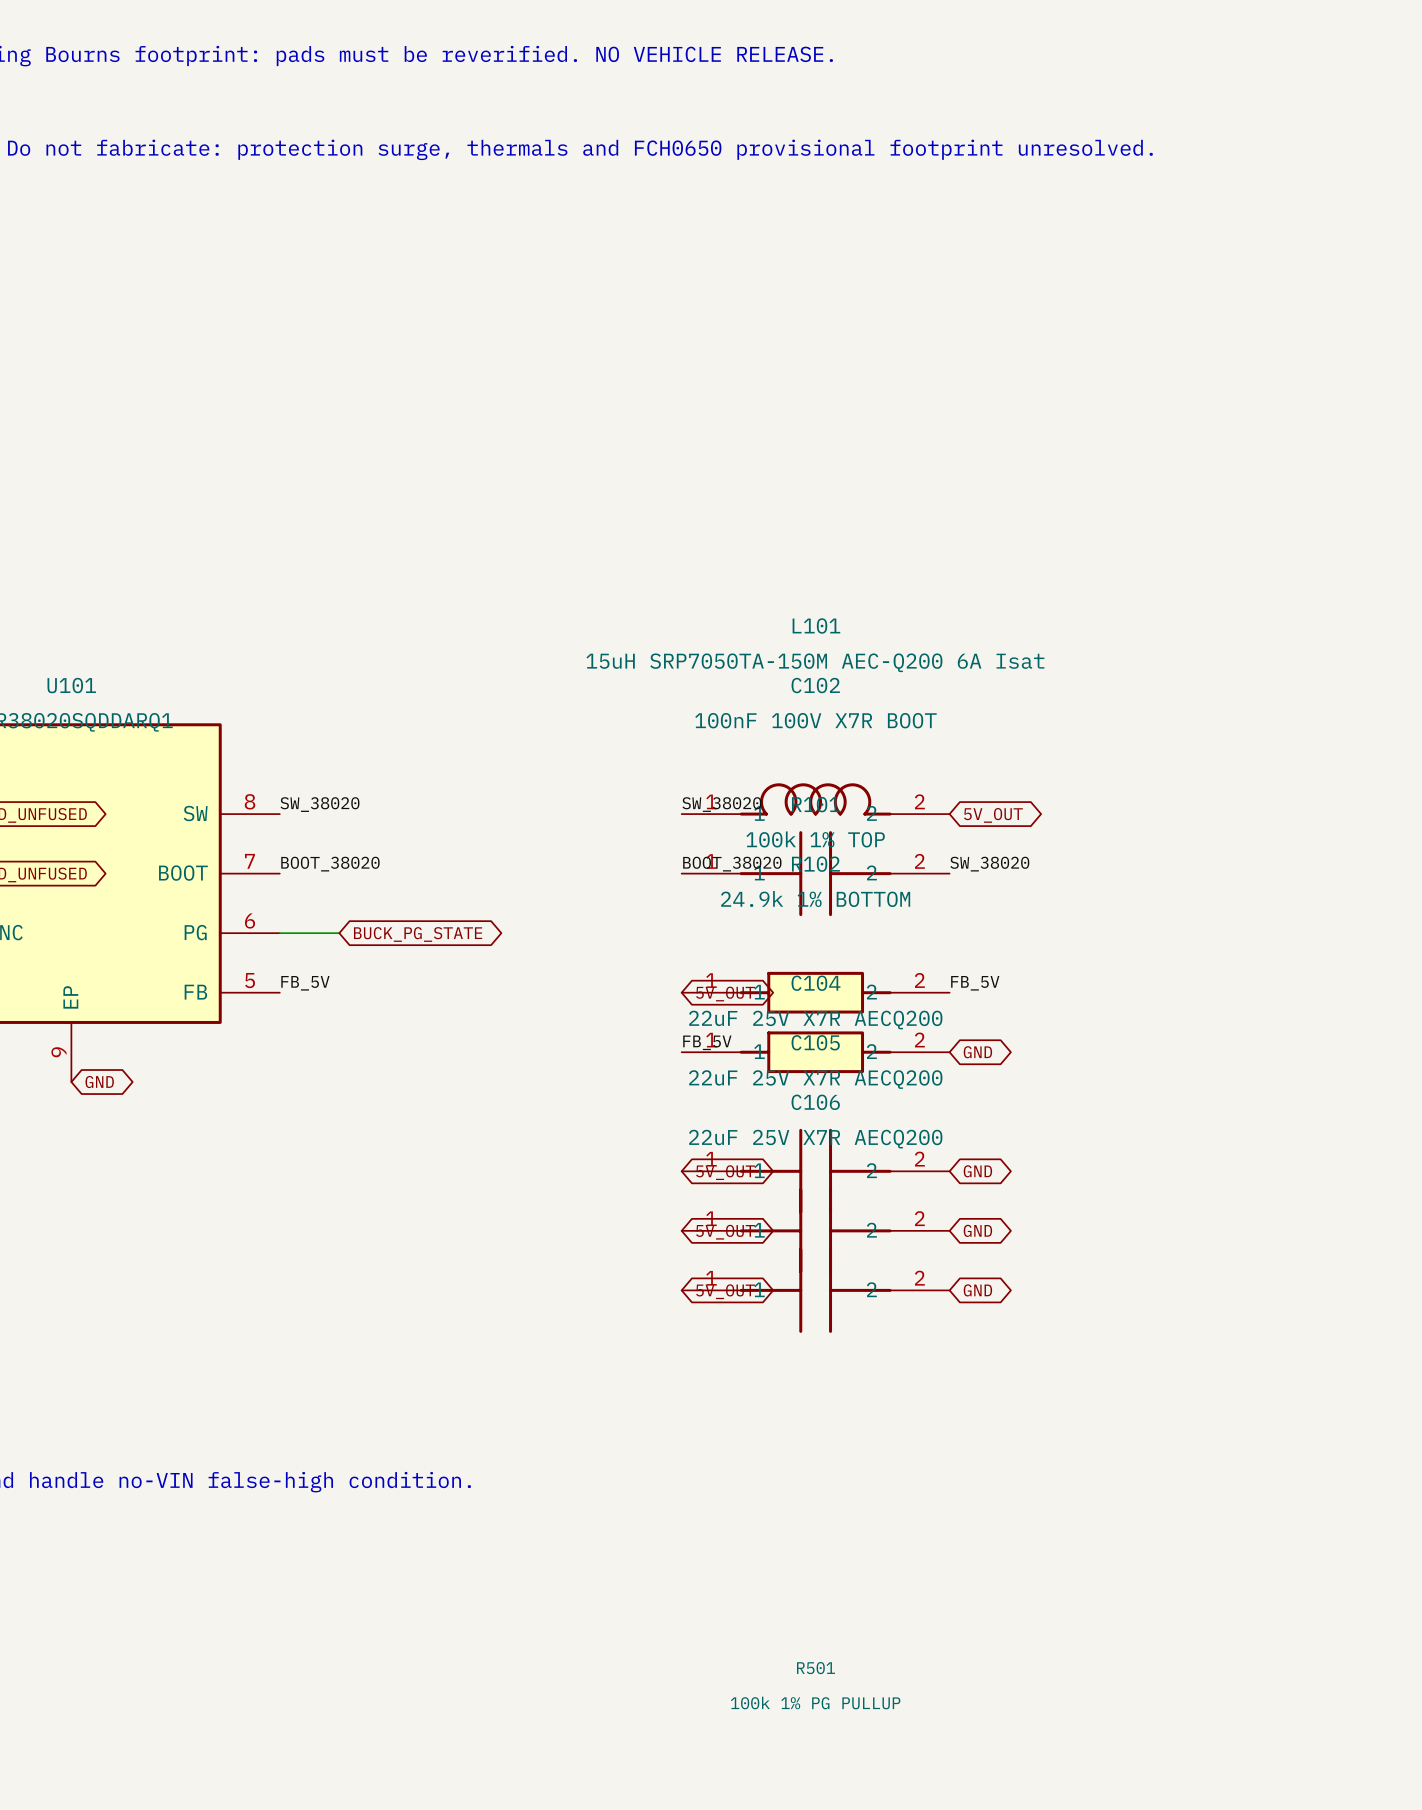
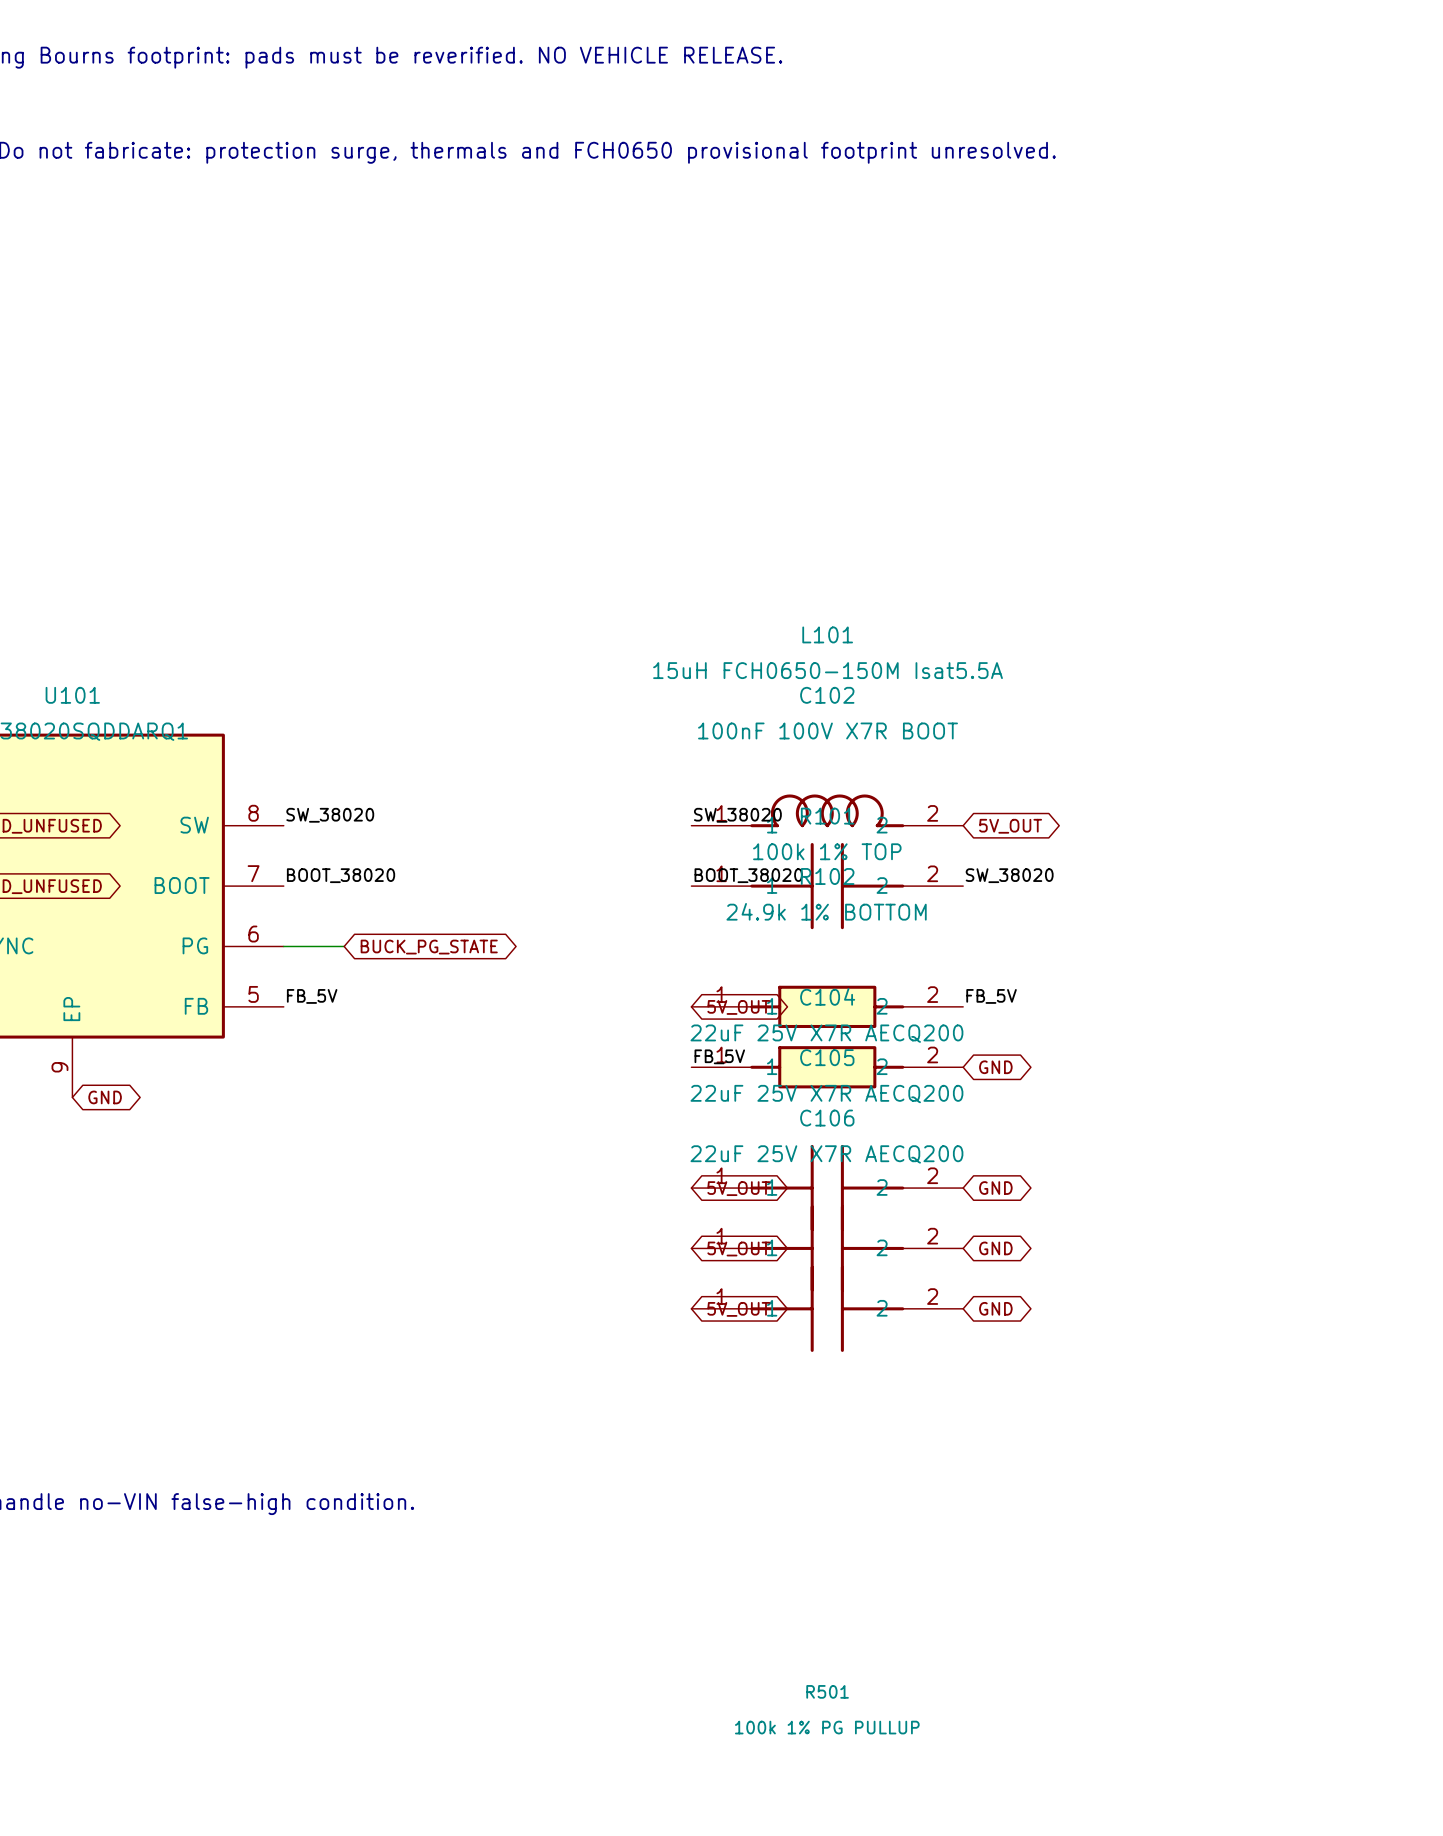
L101 value: 15uH SRP7050TA-150M AEC-Q200 6A Isat (815, 662) -> 15uH FCH0650-150M Isat5.5A (828, 670)

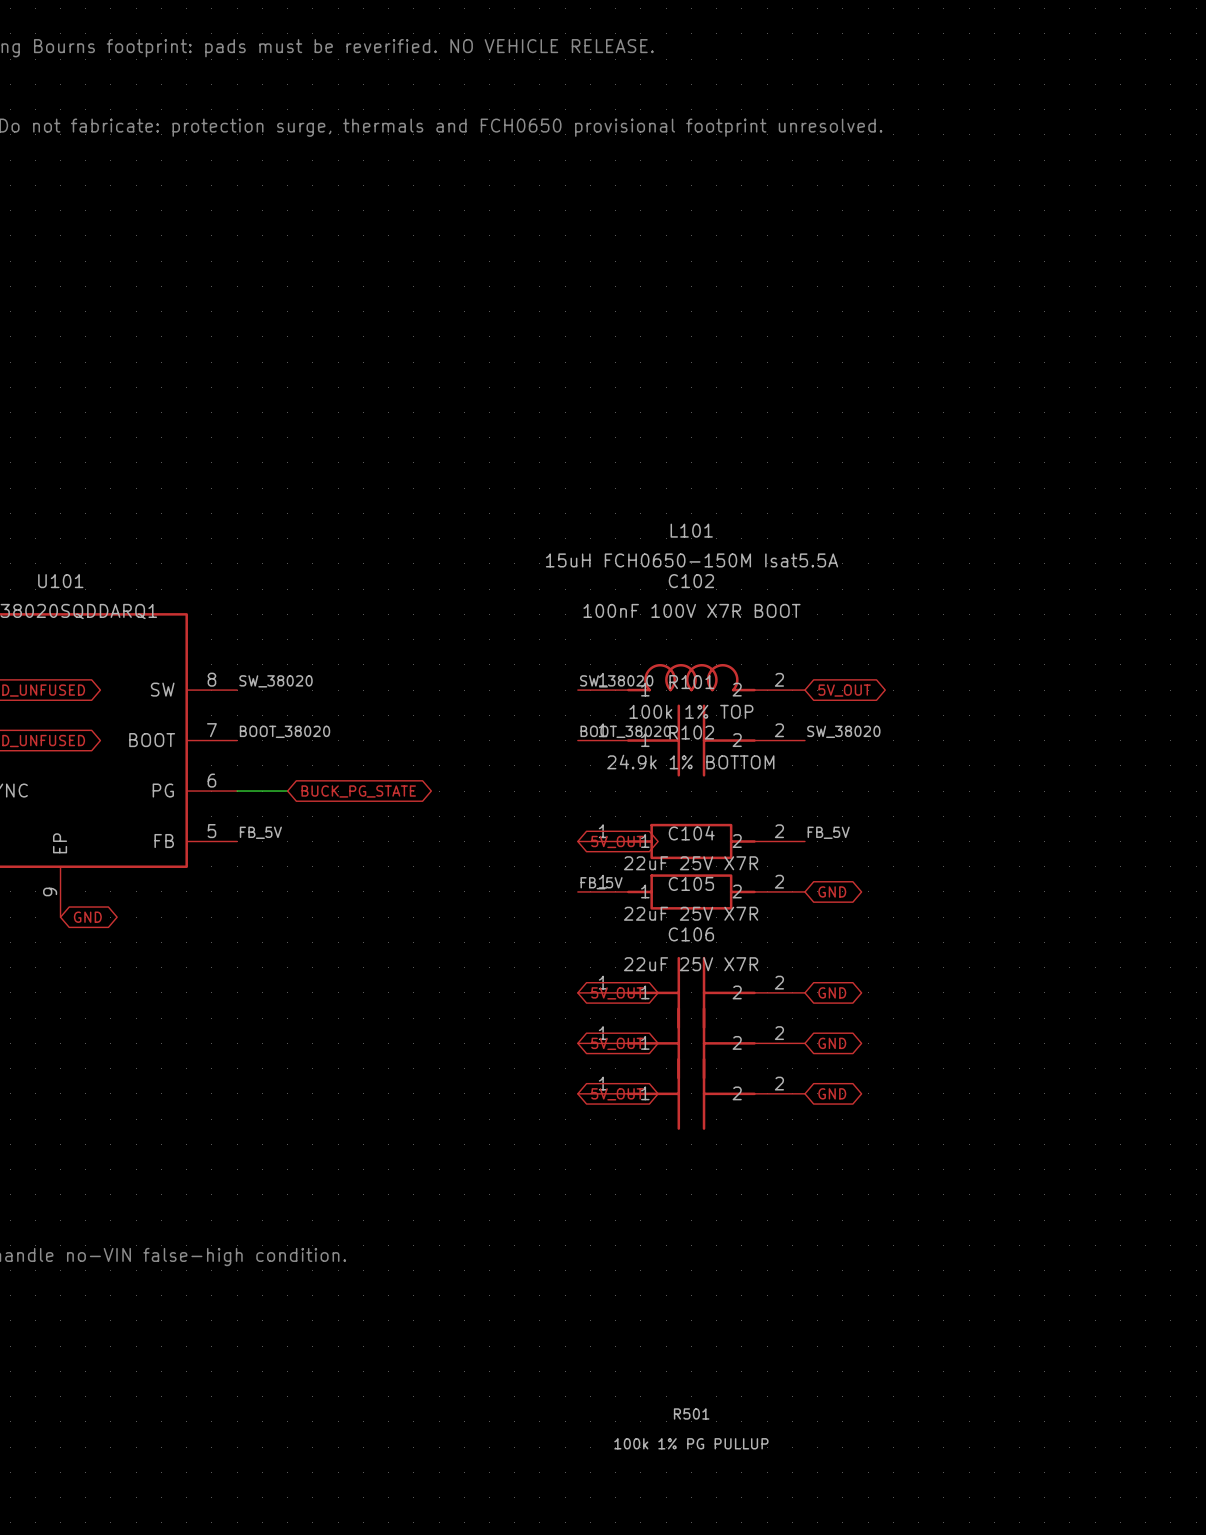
C104 value: 22uF 25V X7R AECQ200 (826, 1033) -> 22uF 25V X7R (691, 863)
C105 value: 22uF 25V X7R AECQ200 (826, 1094) -> 22uF 25V X7R (691, 913)
C106 value: 22uF 25V X7R AECQ200 (826, 1154) -> 22uF 25V X7R (691, 964)

